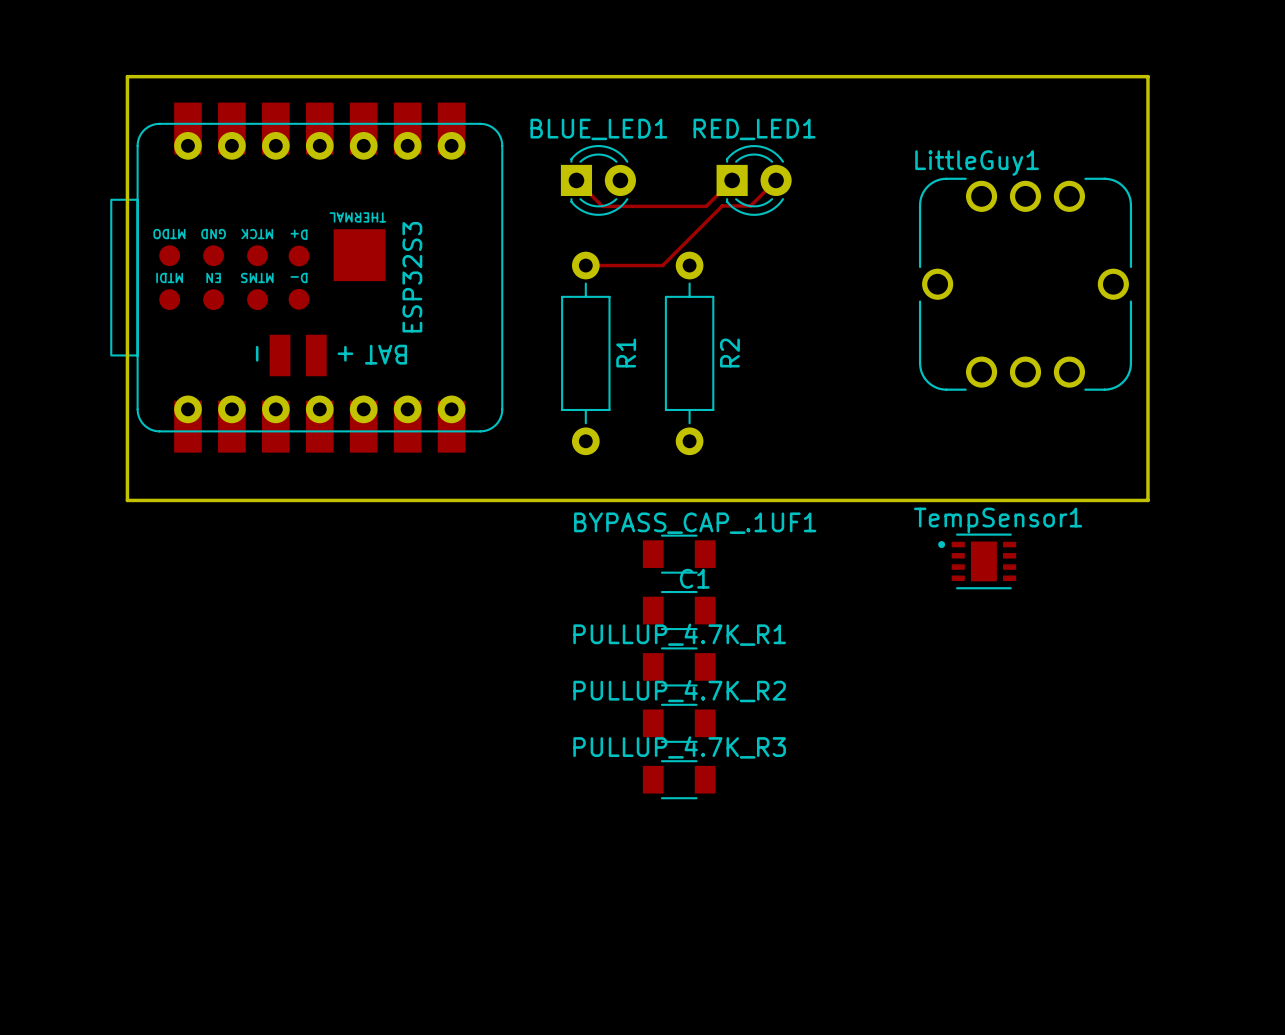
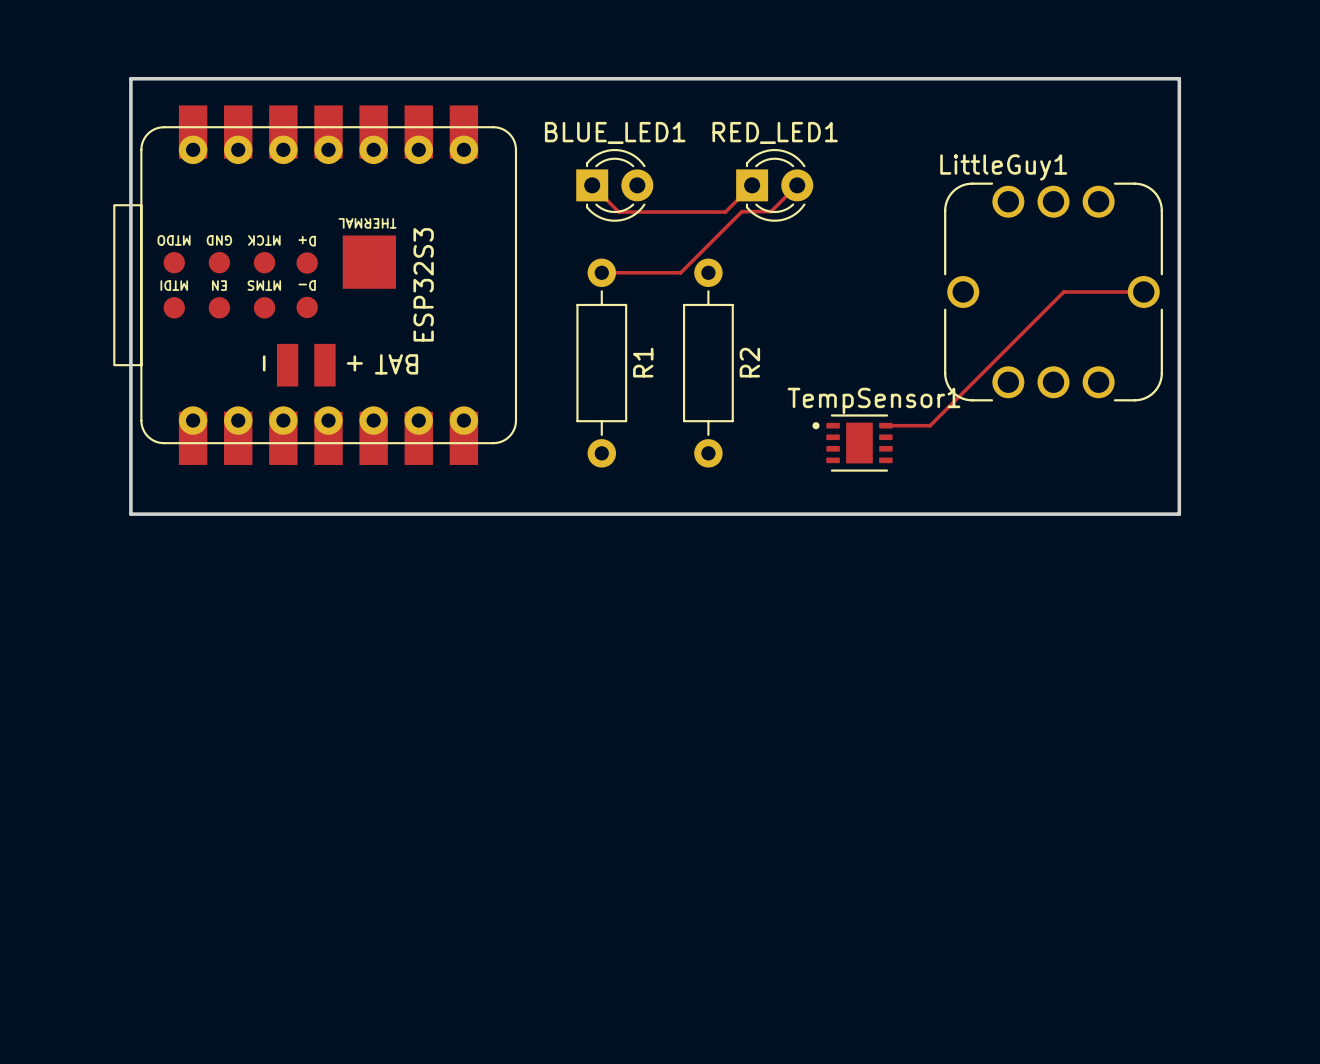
track: none -> (1143, 291) (1063, 291) (930, 425) (885, 425)
BYPASS_CAP_.1UF1: (679, 554) -> none
TempSensor1 position: (977, 561) -> (852, 443)
C1: (679, 610) -> none
PULLUP_4.7K_R1: (679, 666) -> none
PULLUP_4.7K_R2: (679, 723) -> none
PULLUP_4.7K_R3: (679, 779) -> none

